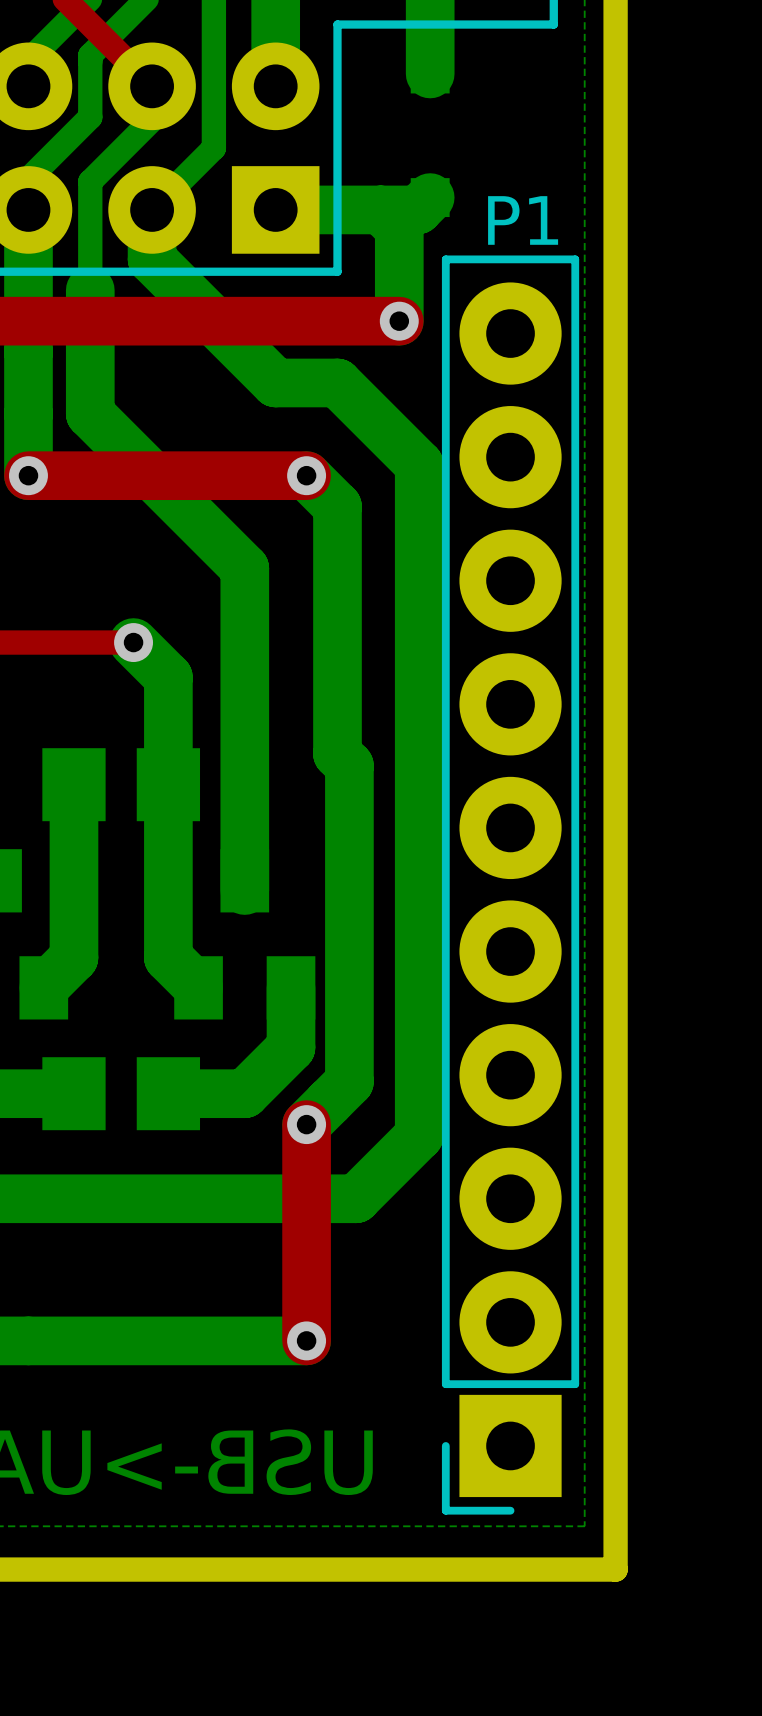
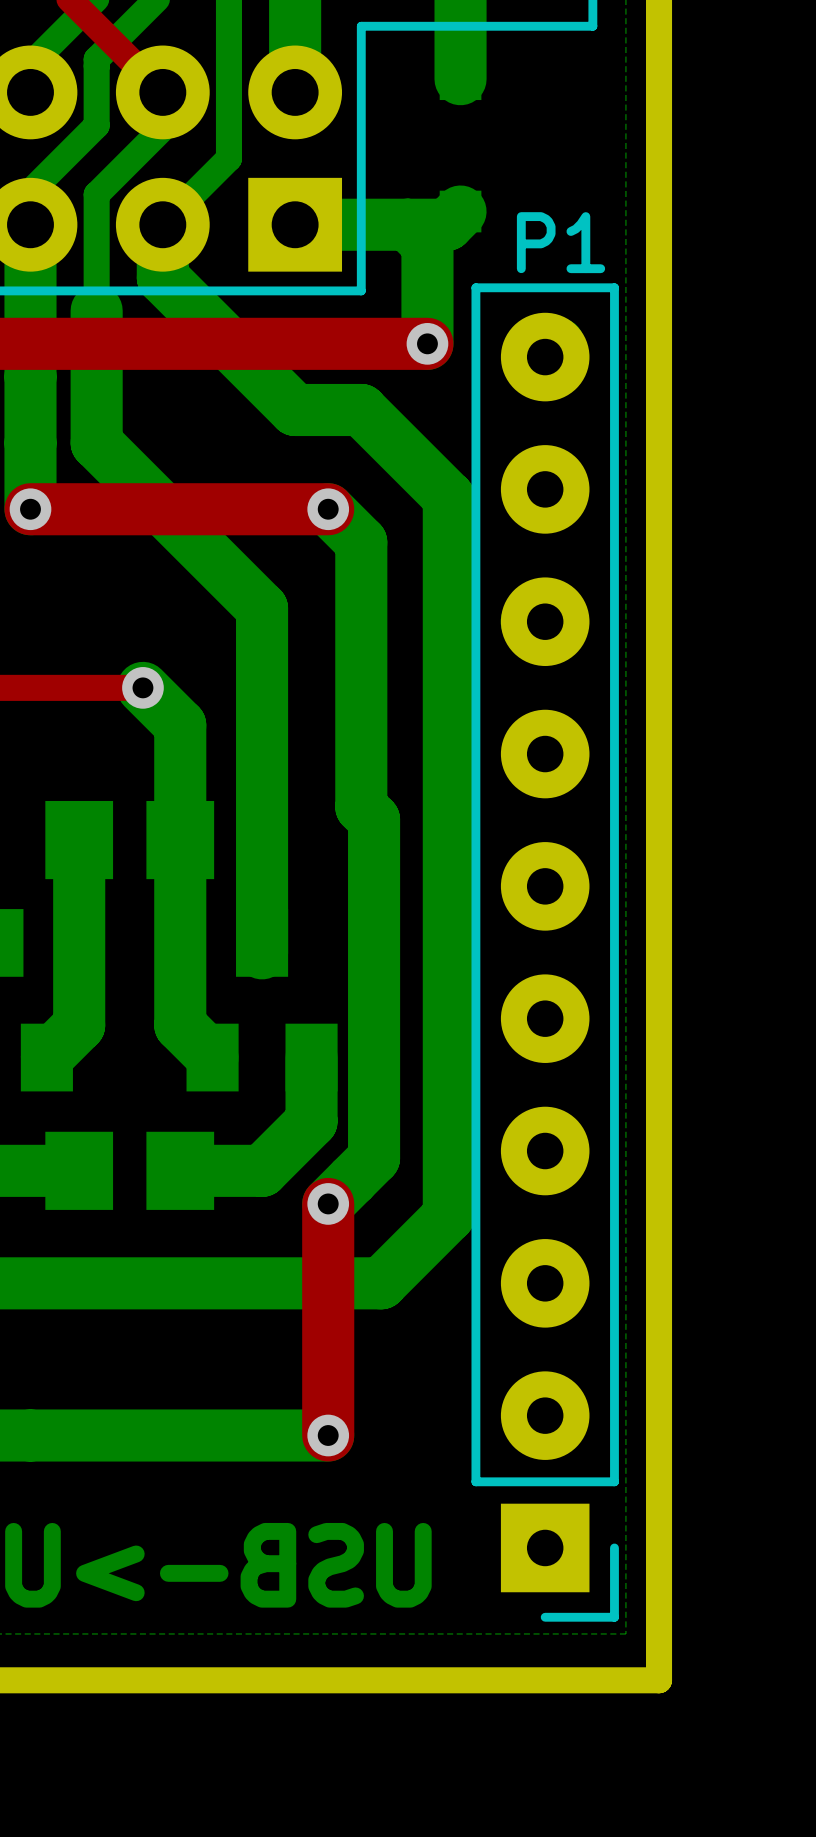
P1 footprint: [441, 255, 580, 1515] -> [471, 283, 619, 1622]

